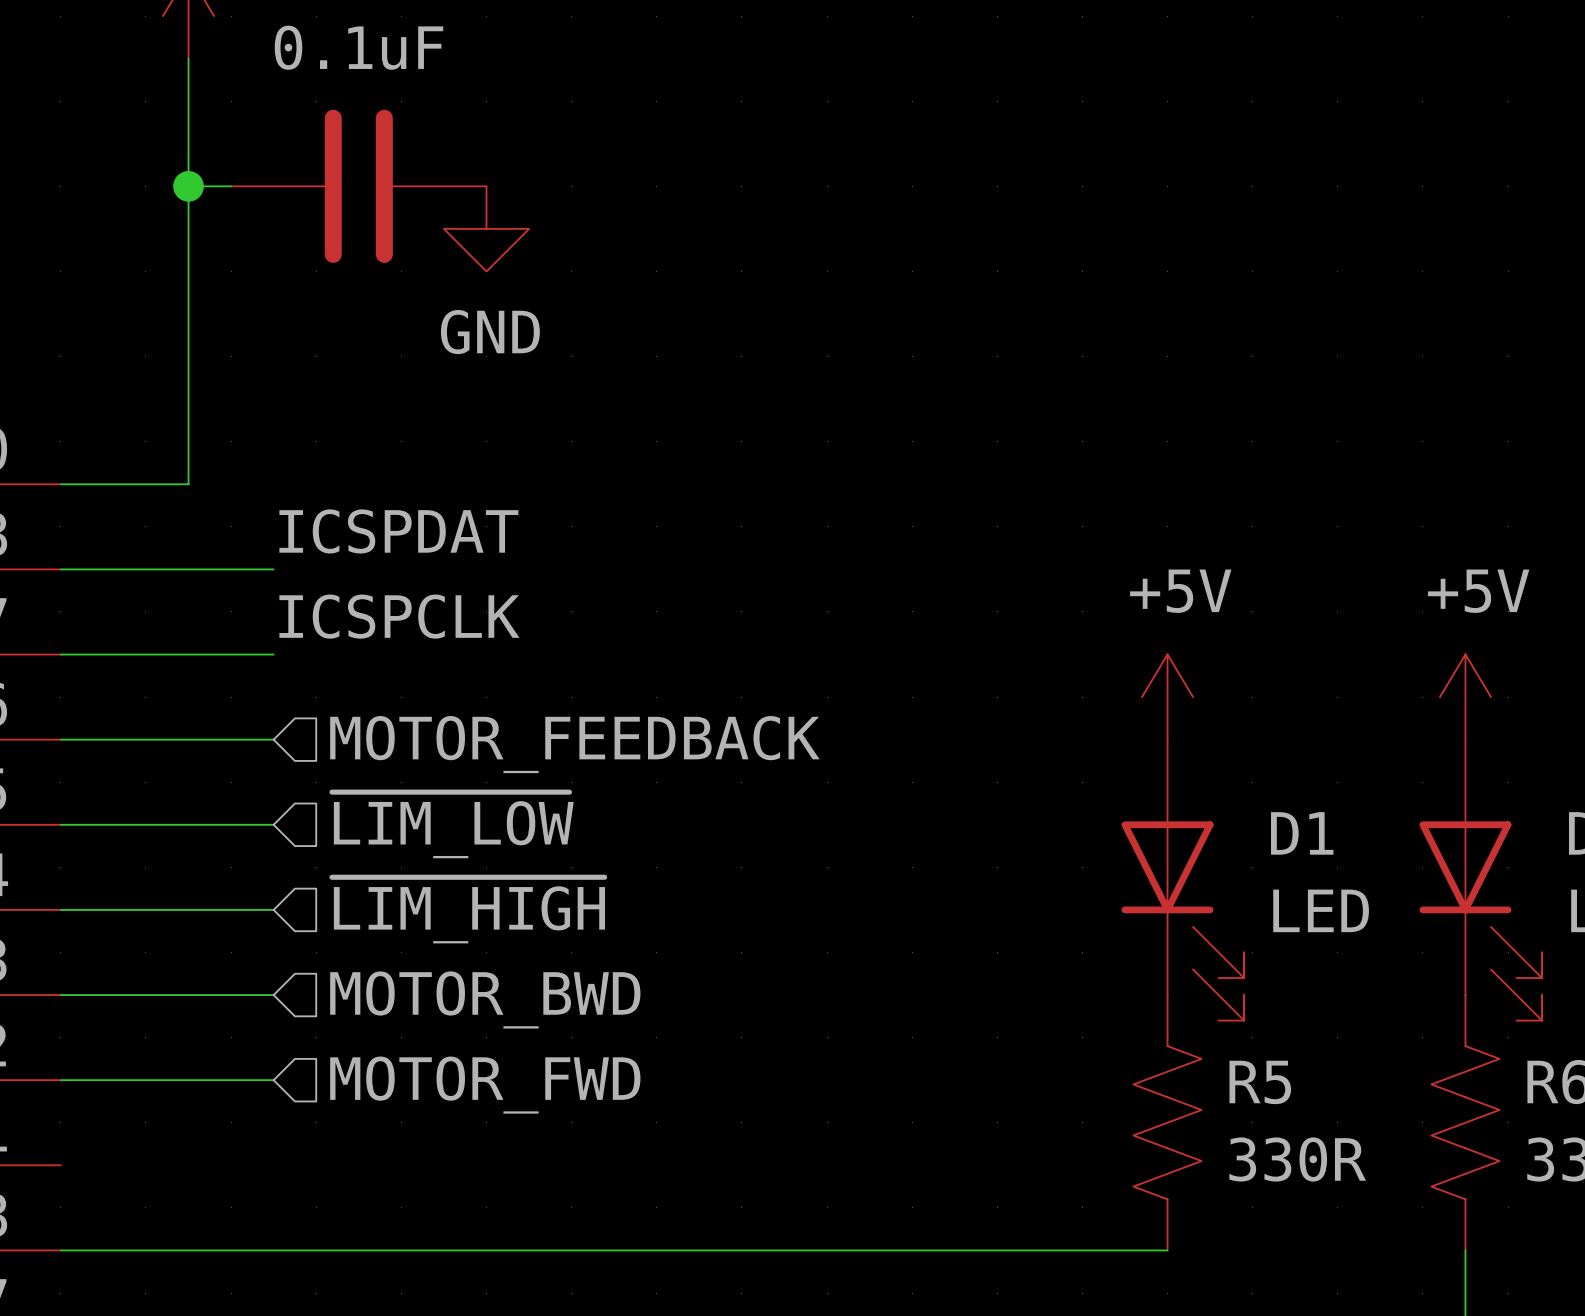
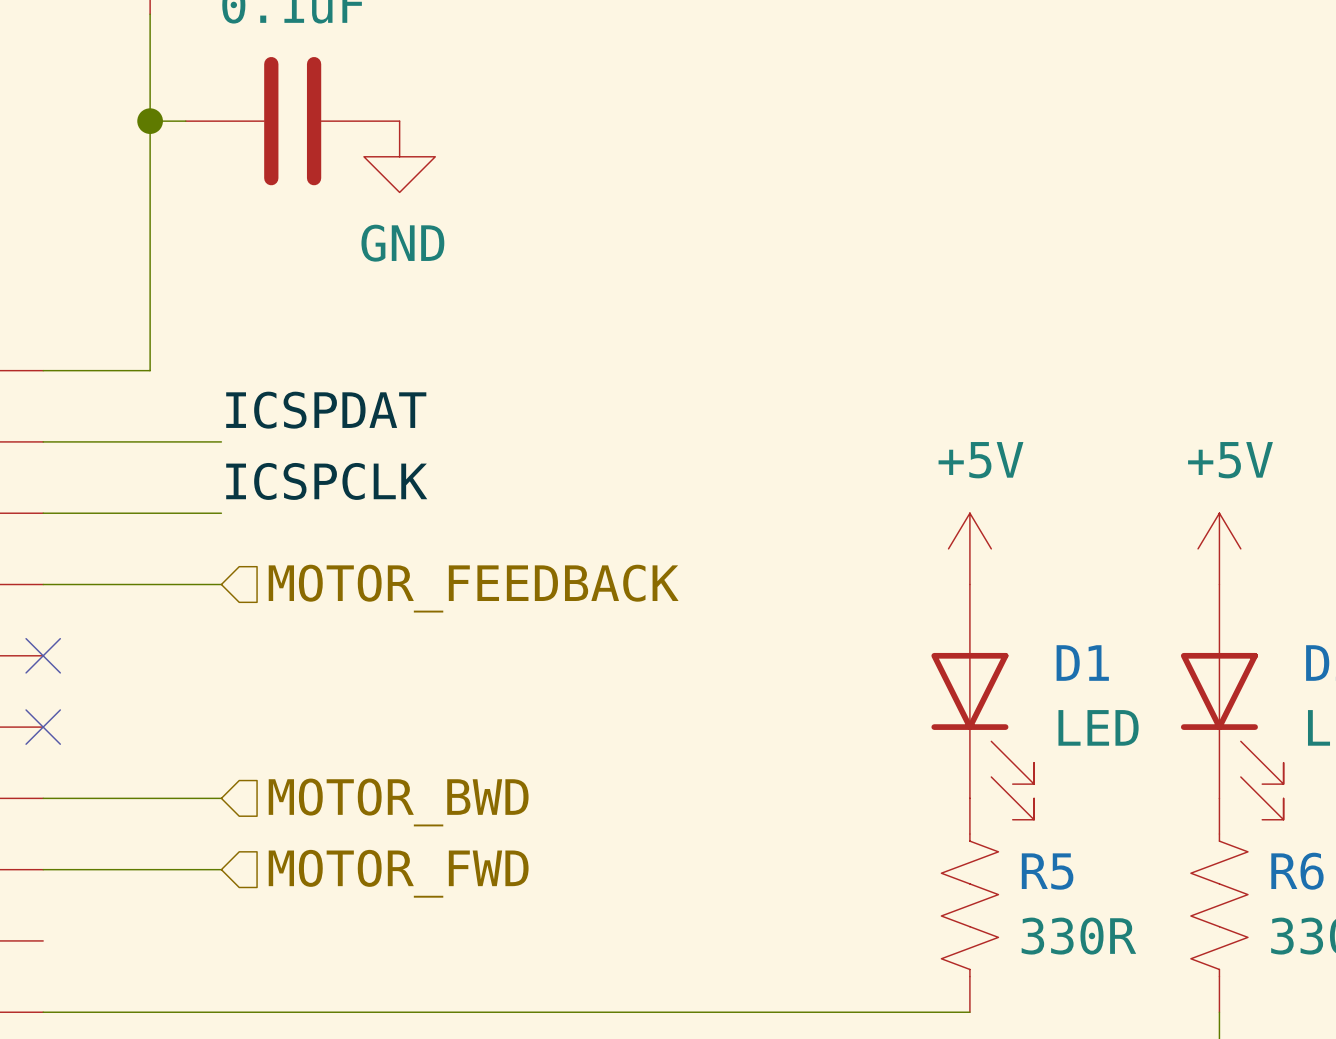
wire: (60, 824) (273, 824) -> none
no-connect mark: none -> (43, 655)
hierarchical label: ~{LIM_LOW} (452, 825) -> none
wire: (60, 909) (273, 909) -> none
no-connect mark: none -> (43, 727)
hierarchical label: ~{LIM_HIGH} (468, 910) -> none

